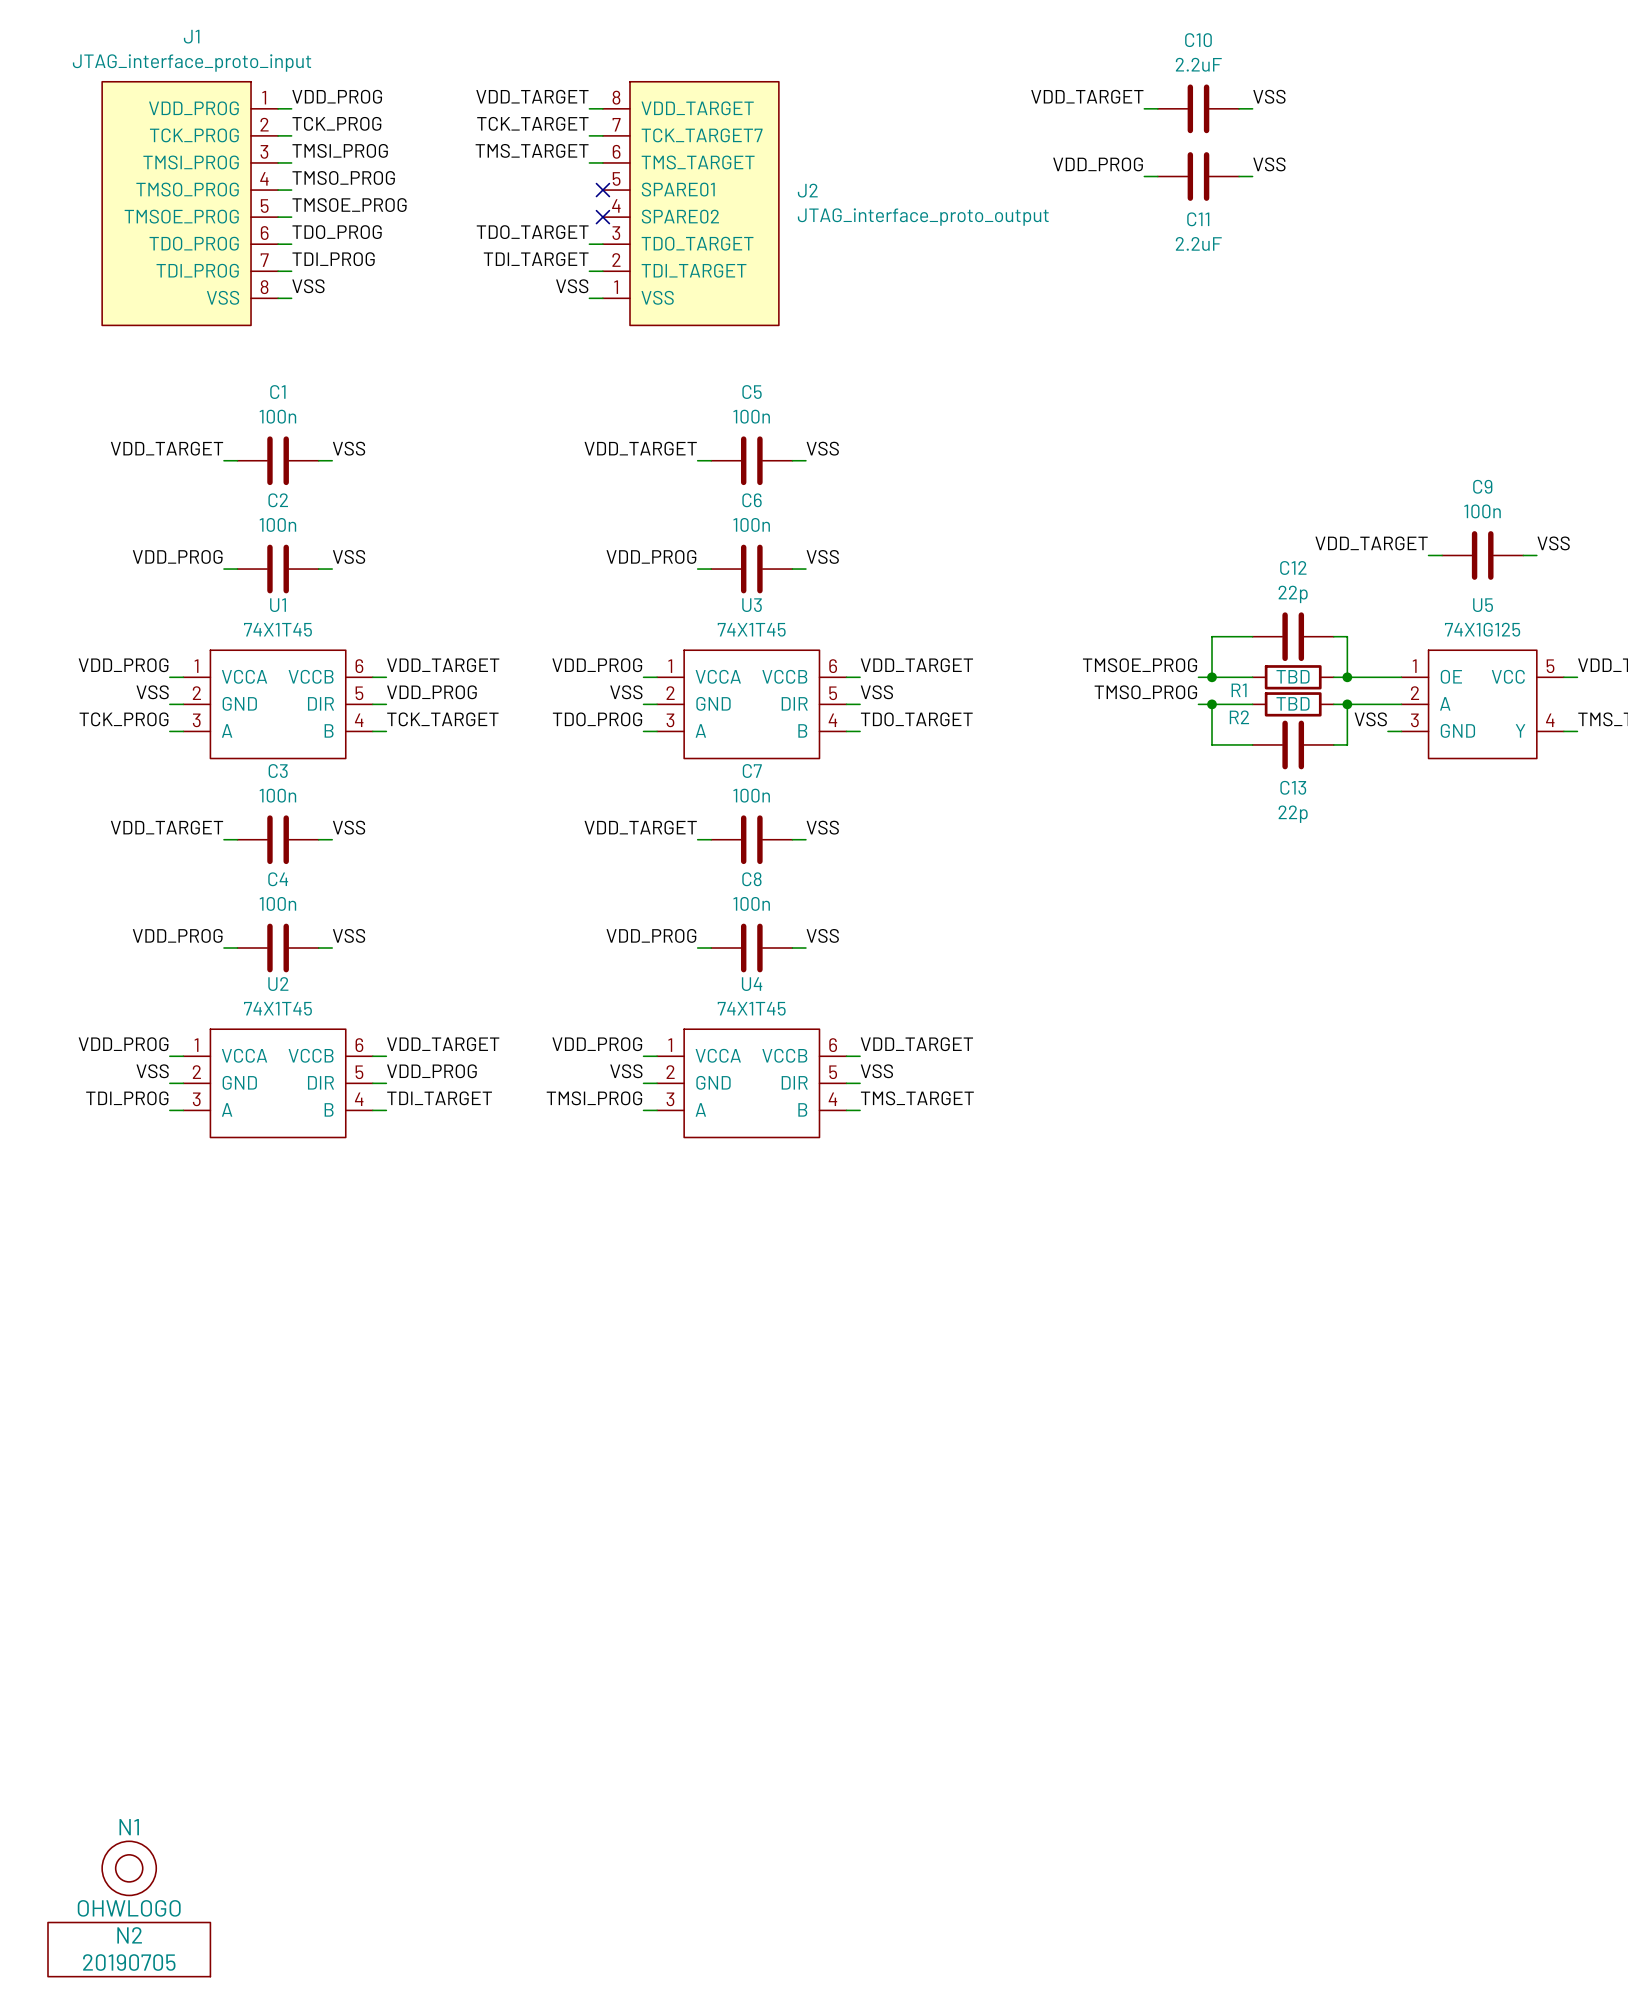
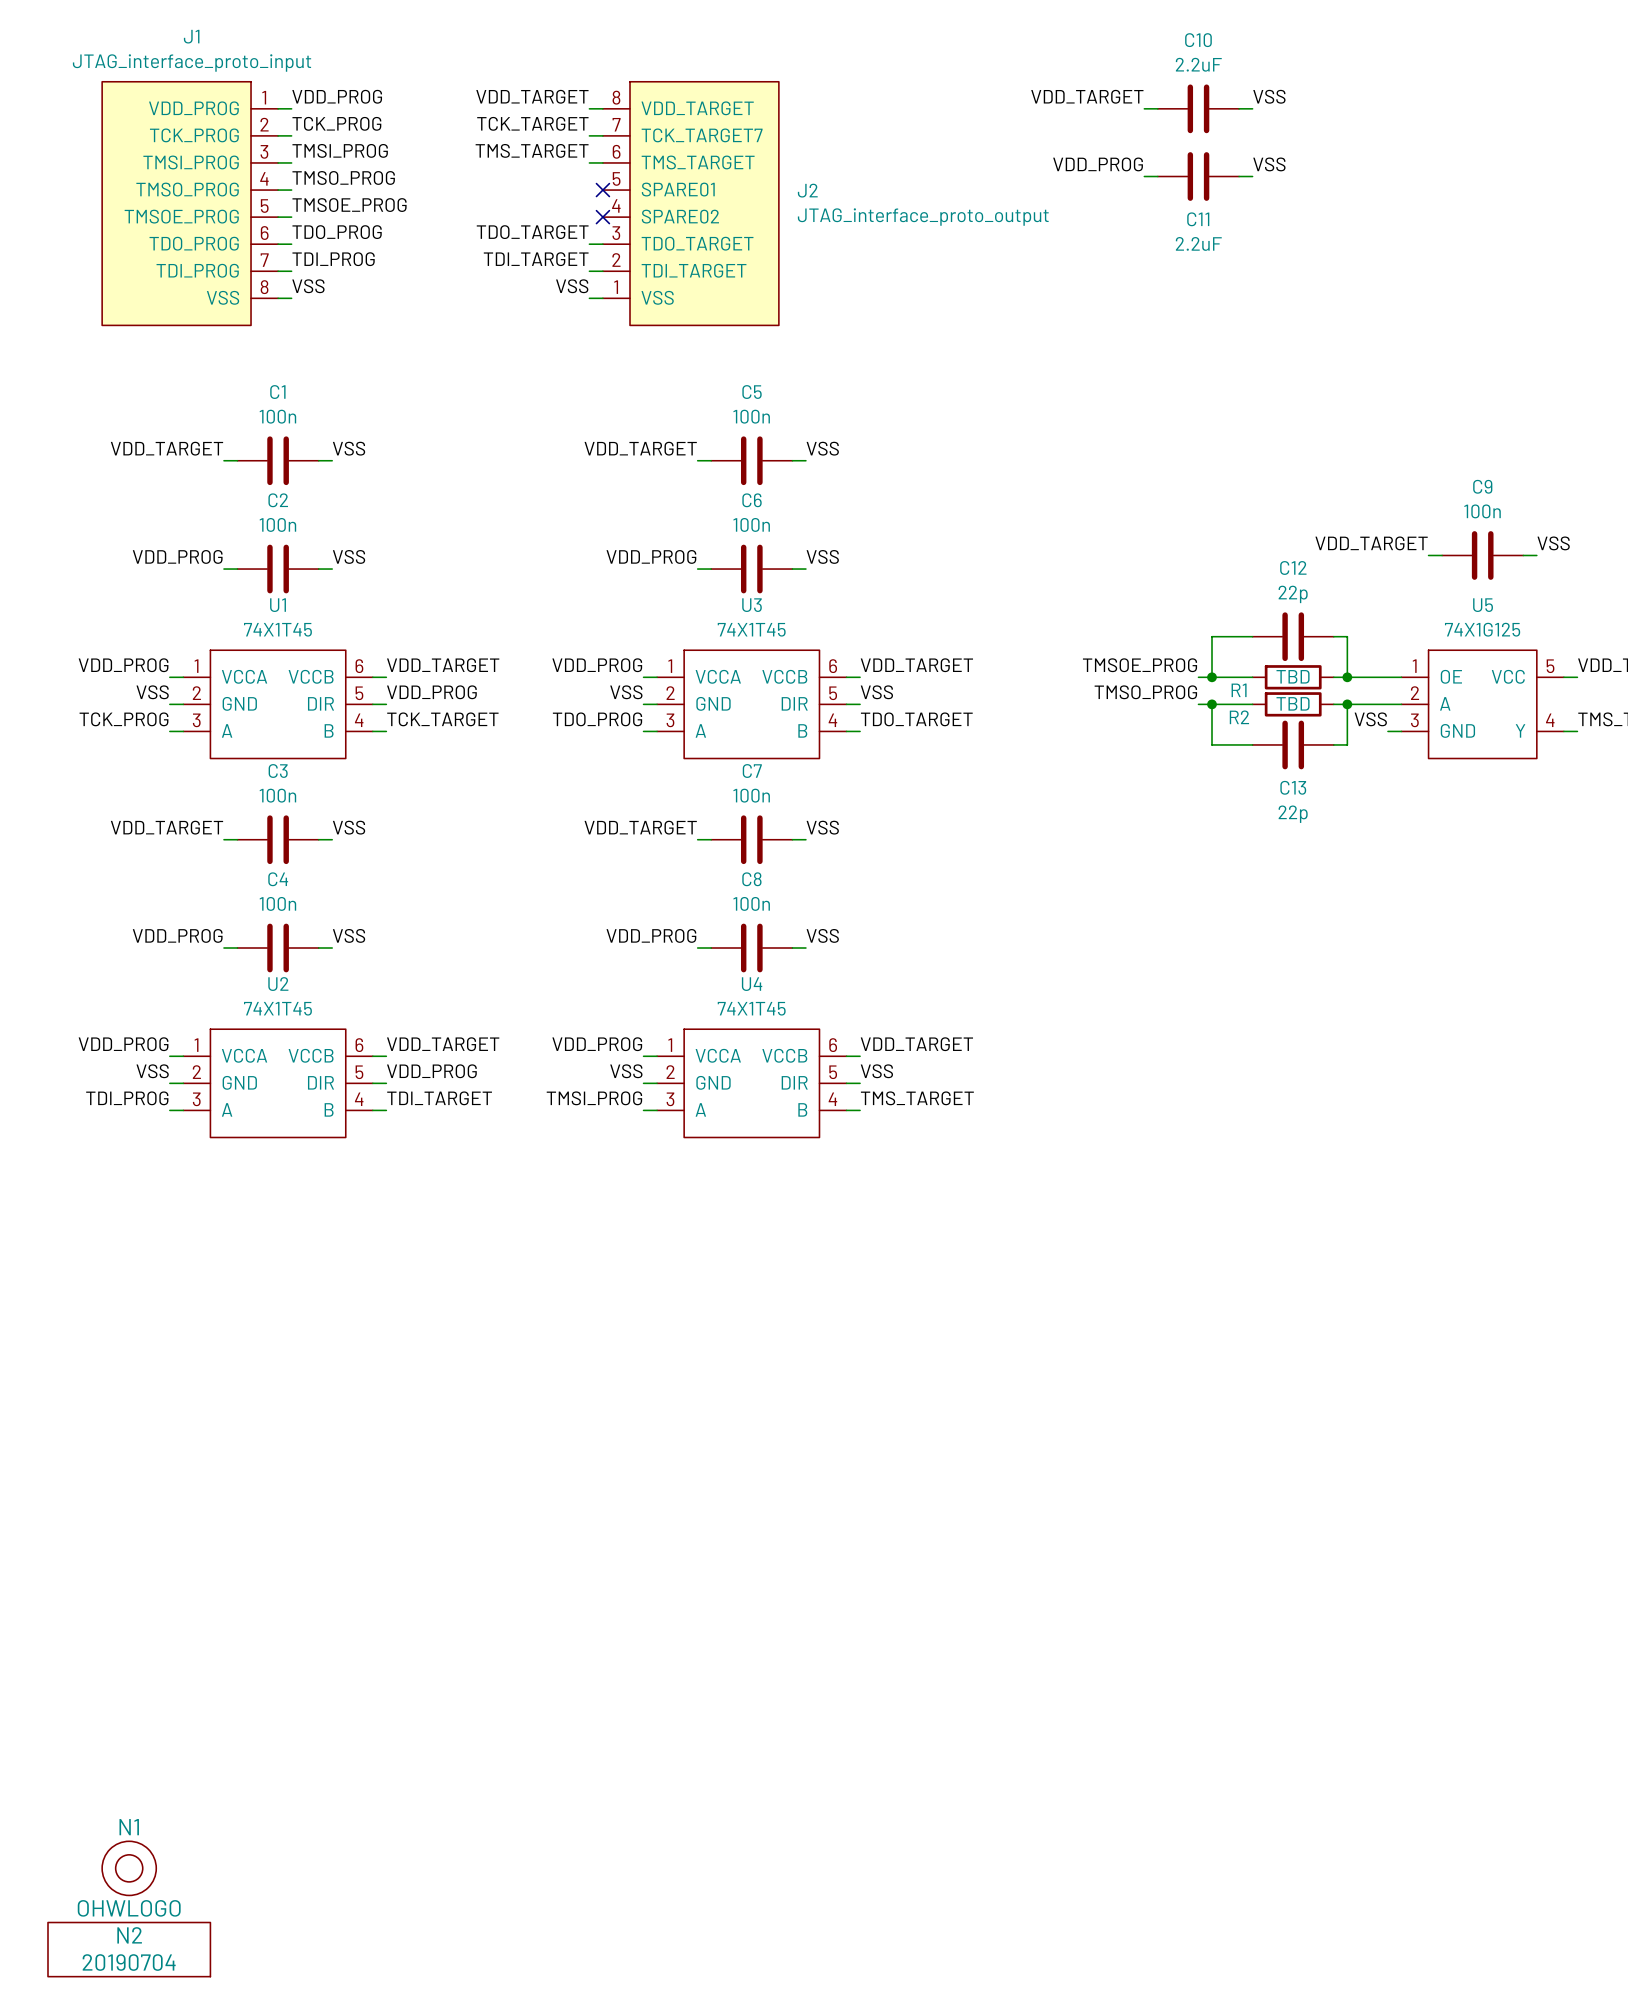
N2 value: 20190705 (129, 1962) -> 20190704 (129, 1962)

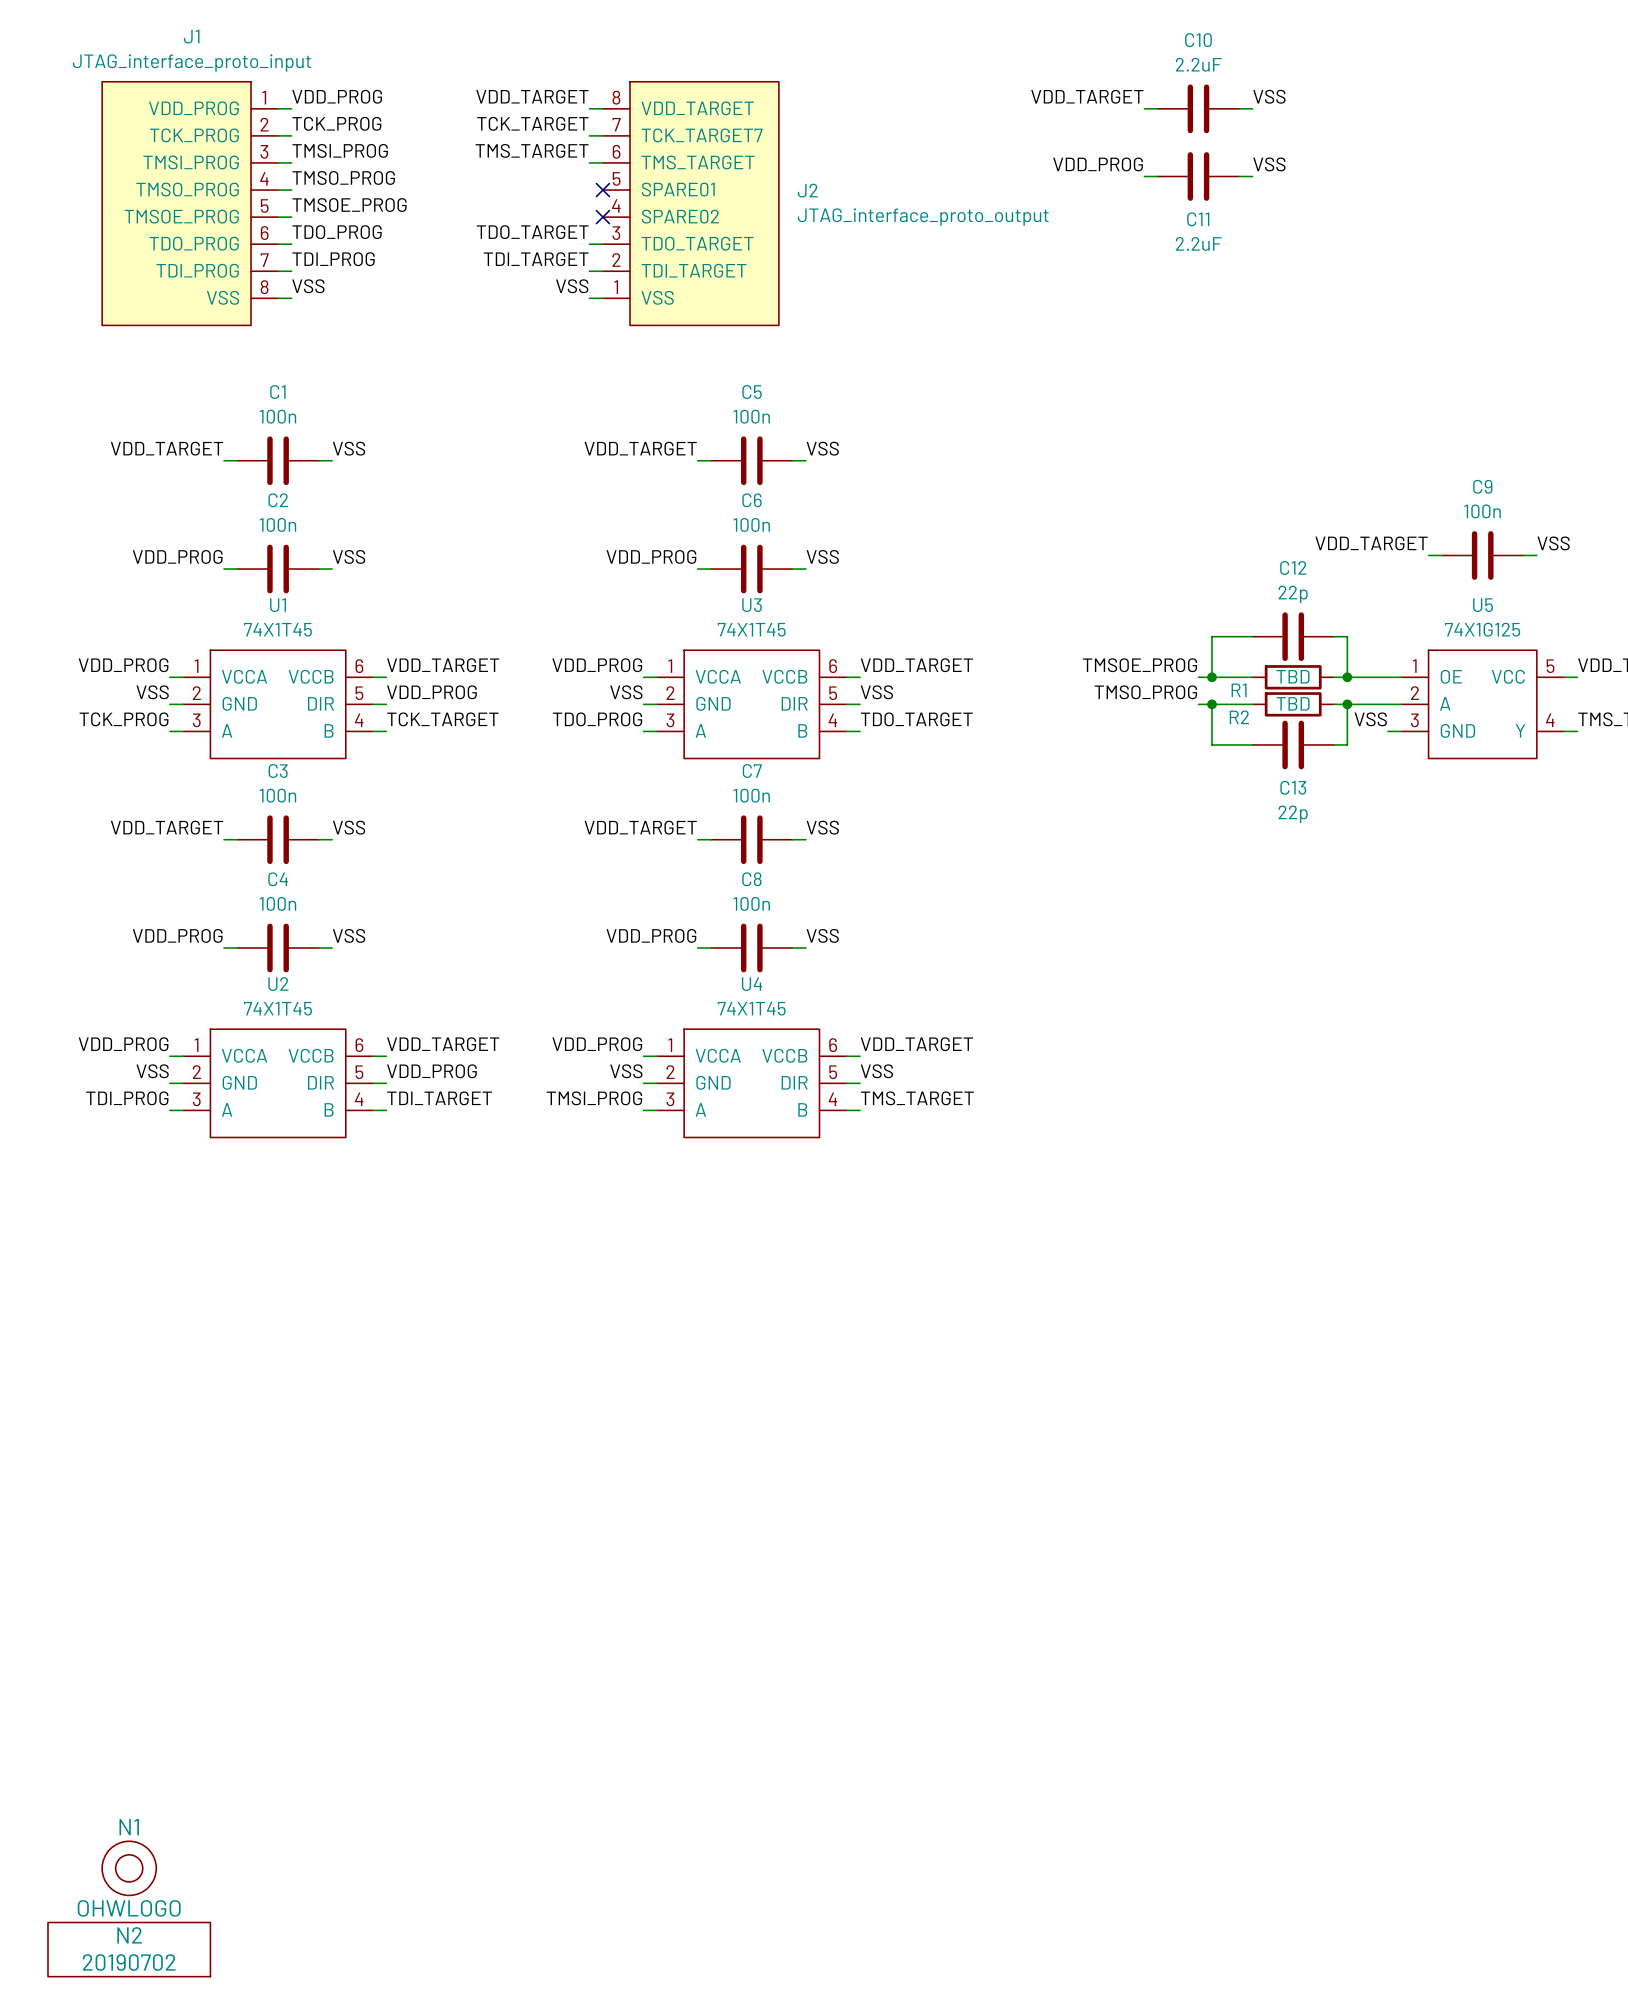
N2 value: 20190704 (129, 1962) -> 20190702 (129, 1962)

